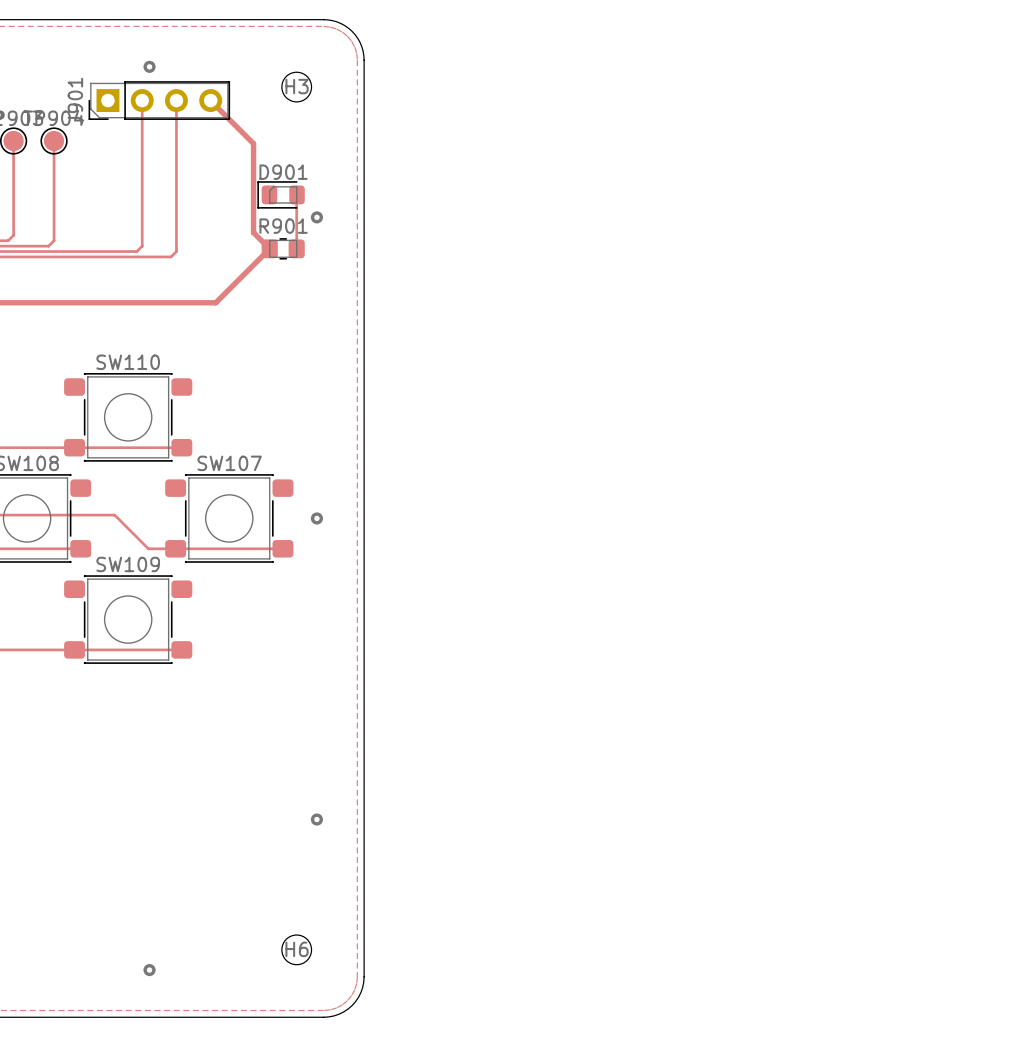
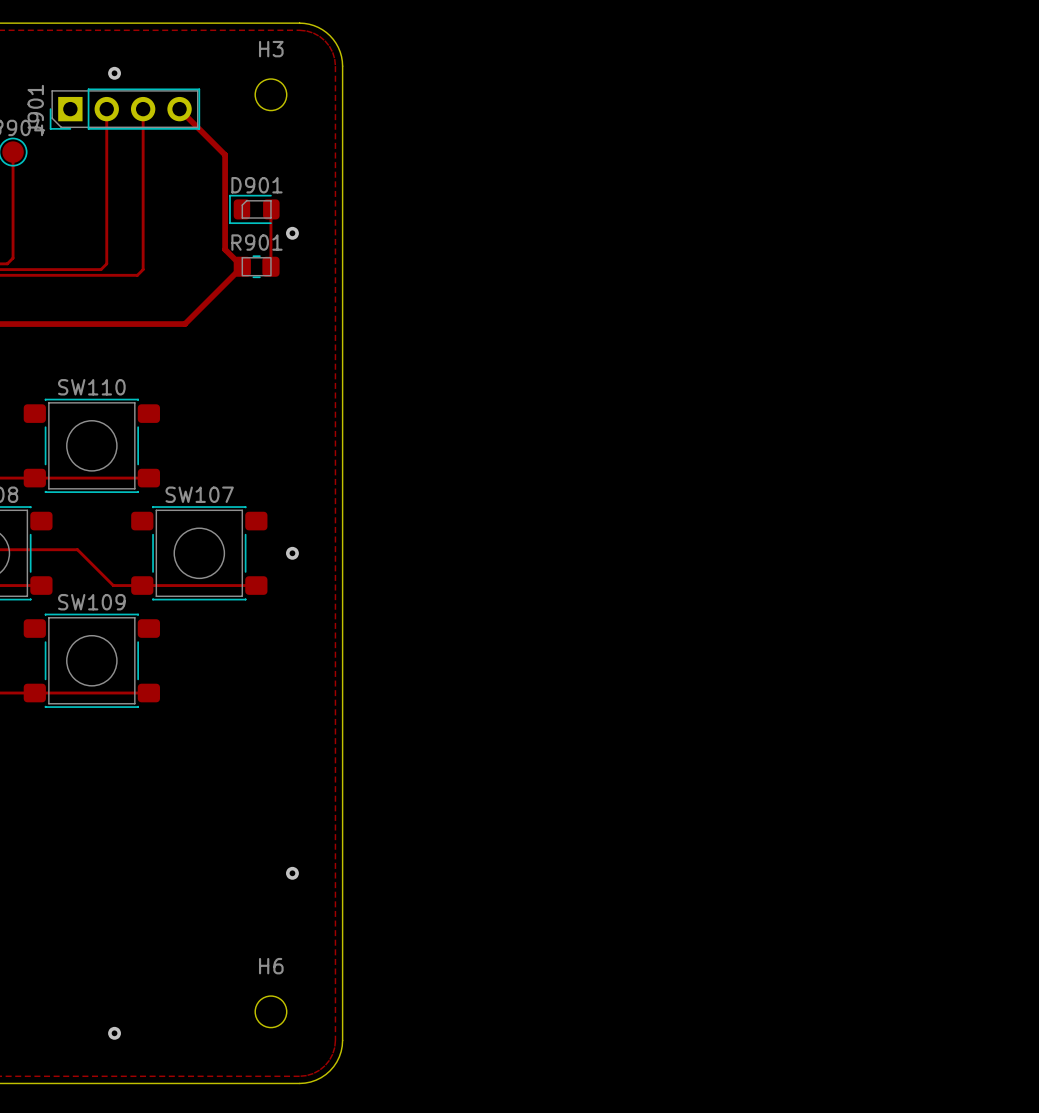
H3 name position: H3 (297, 86) -> H3 (271, 49)
H6 name position: H6 (297, 949) -> H6 (271, 966)

